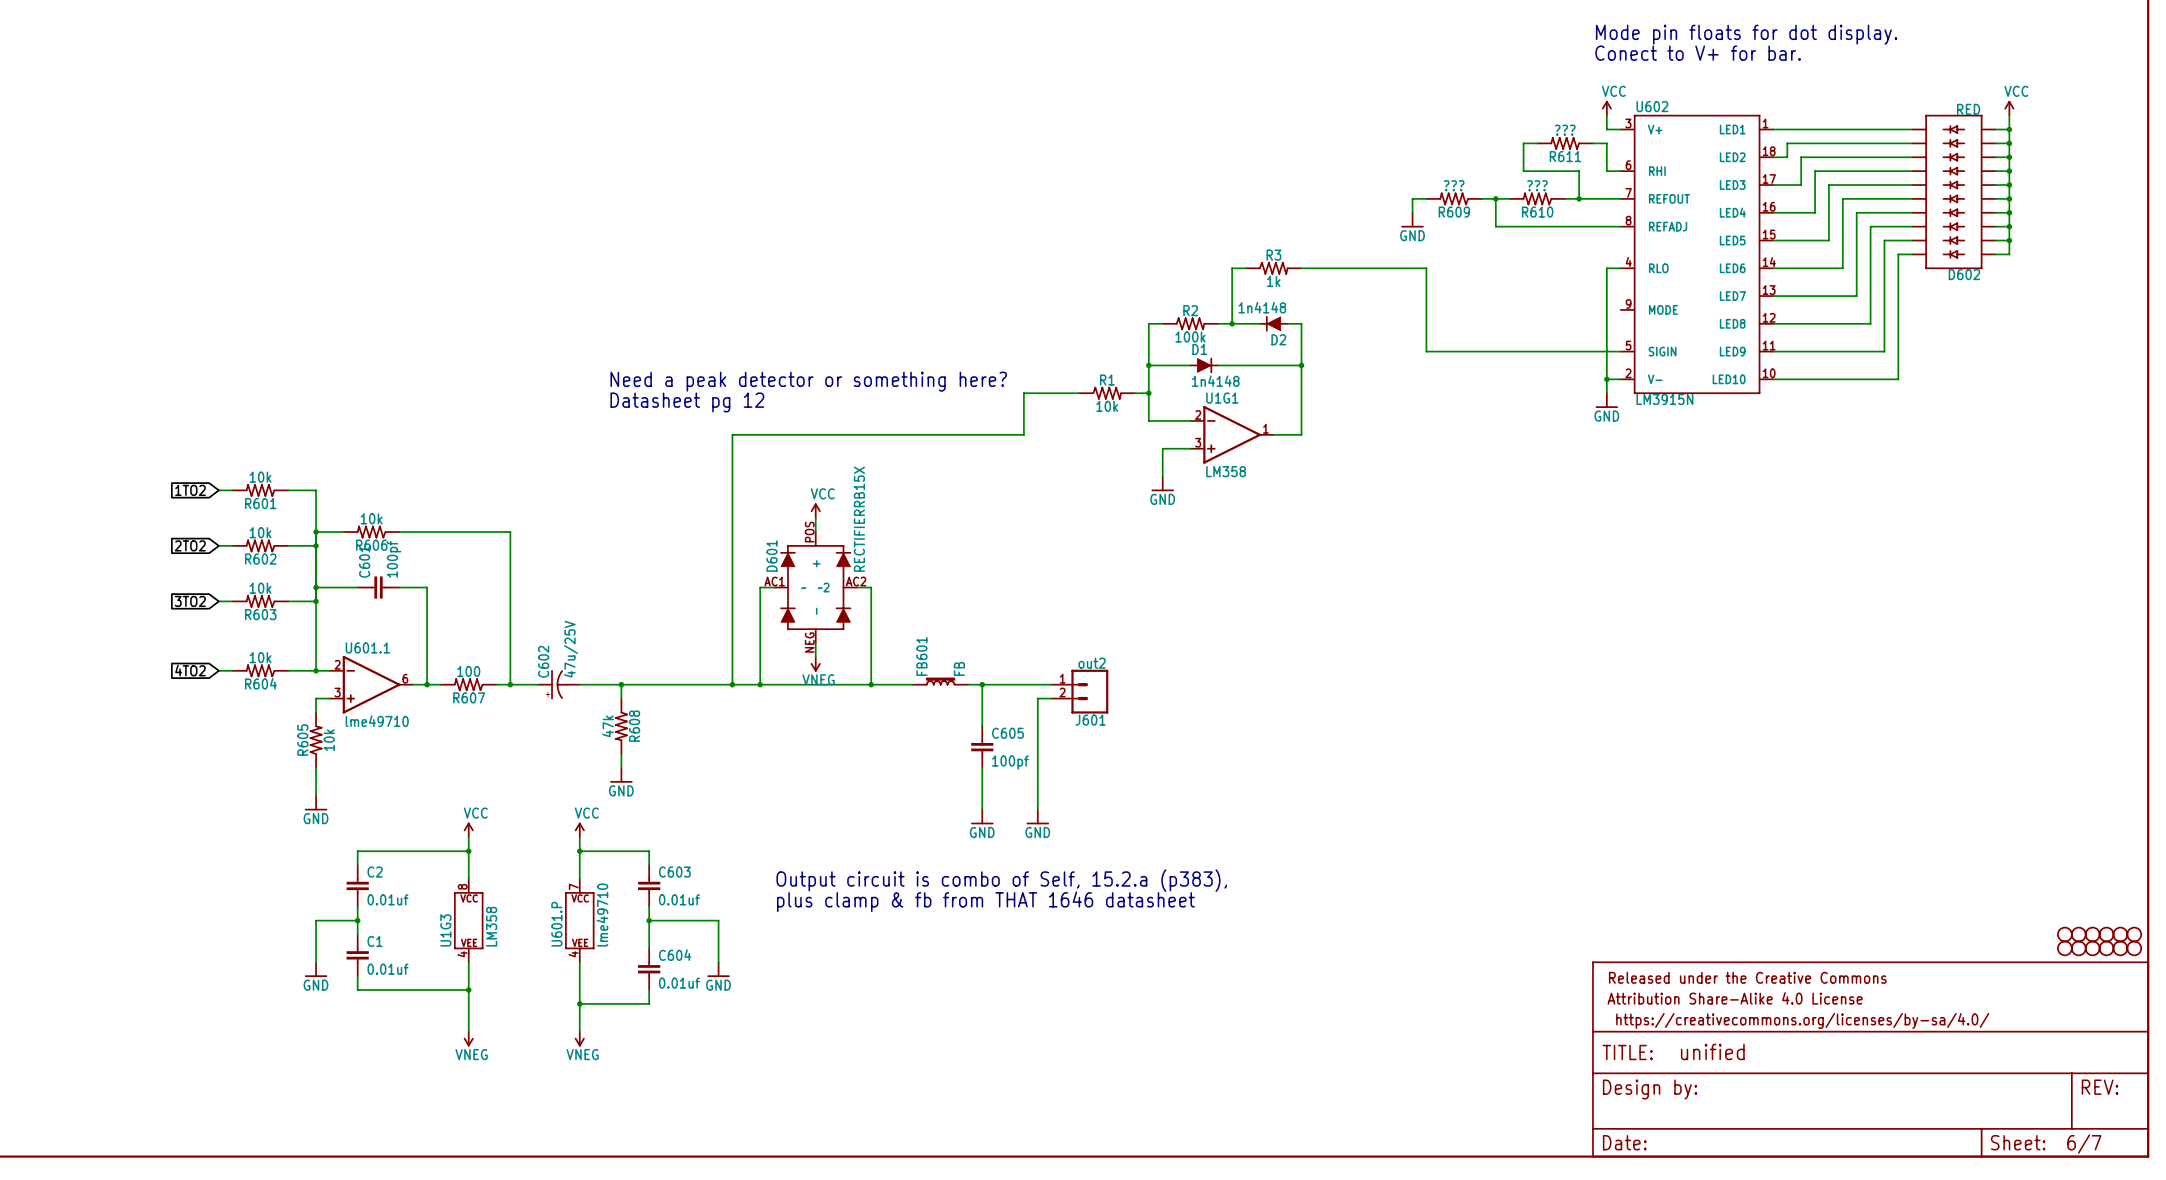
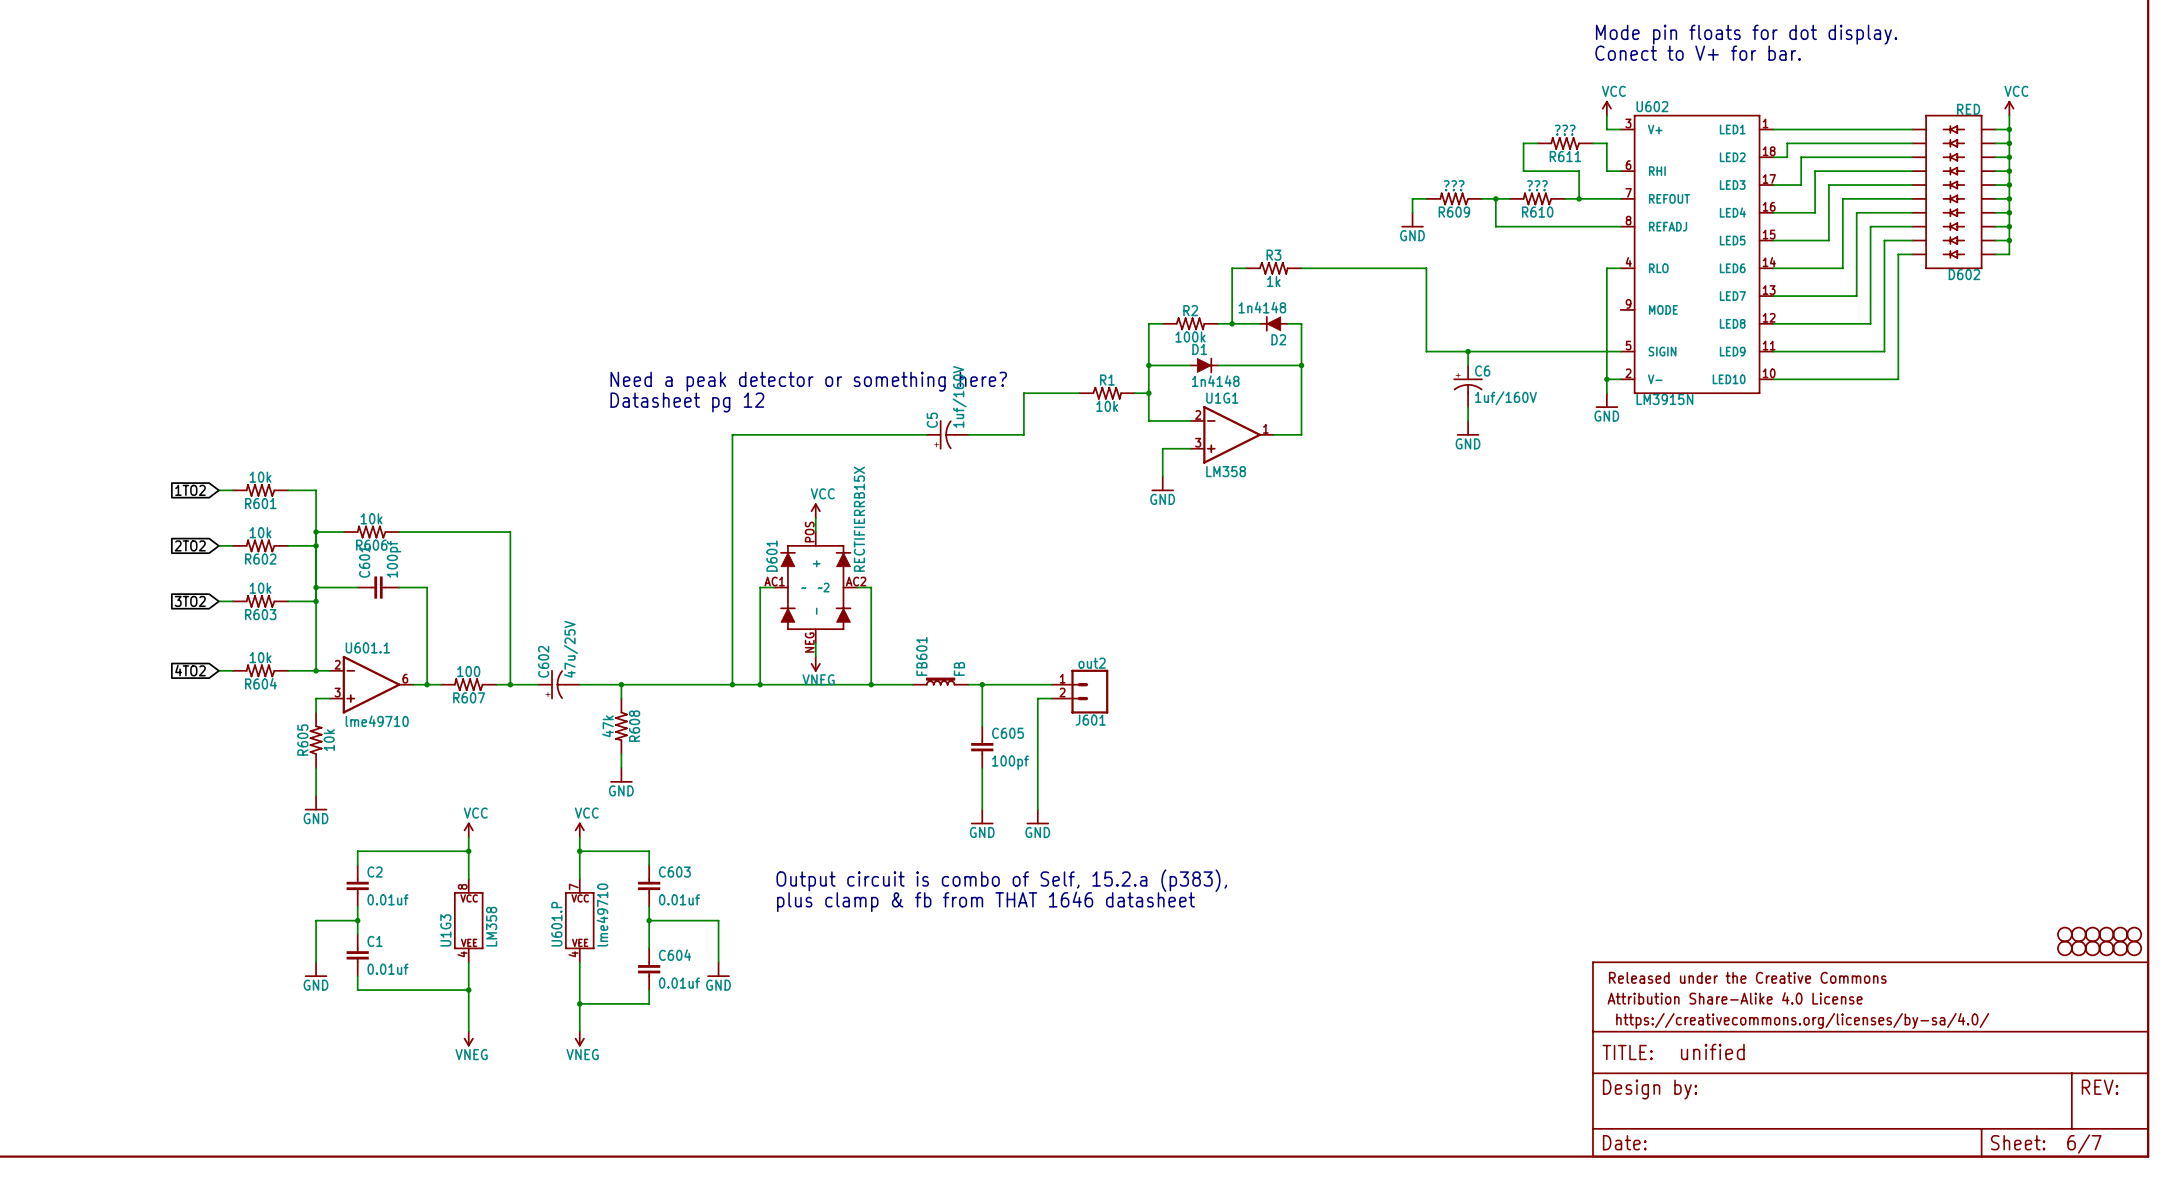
wire: none -> (1468, 351) (1468, 365)
junction: none -> (1468, 351)
C6: none -> 1uf/160V (1468, 386)
wire: none -> (1468, 407) (1468, 420)
power symbol: none -> GND (1468, 428)
C5: none -> 1uf/160V (947, 434)

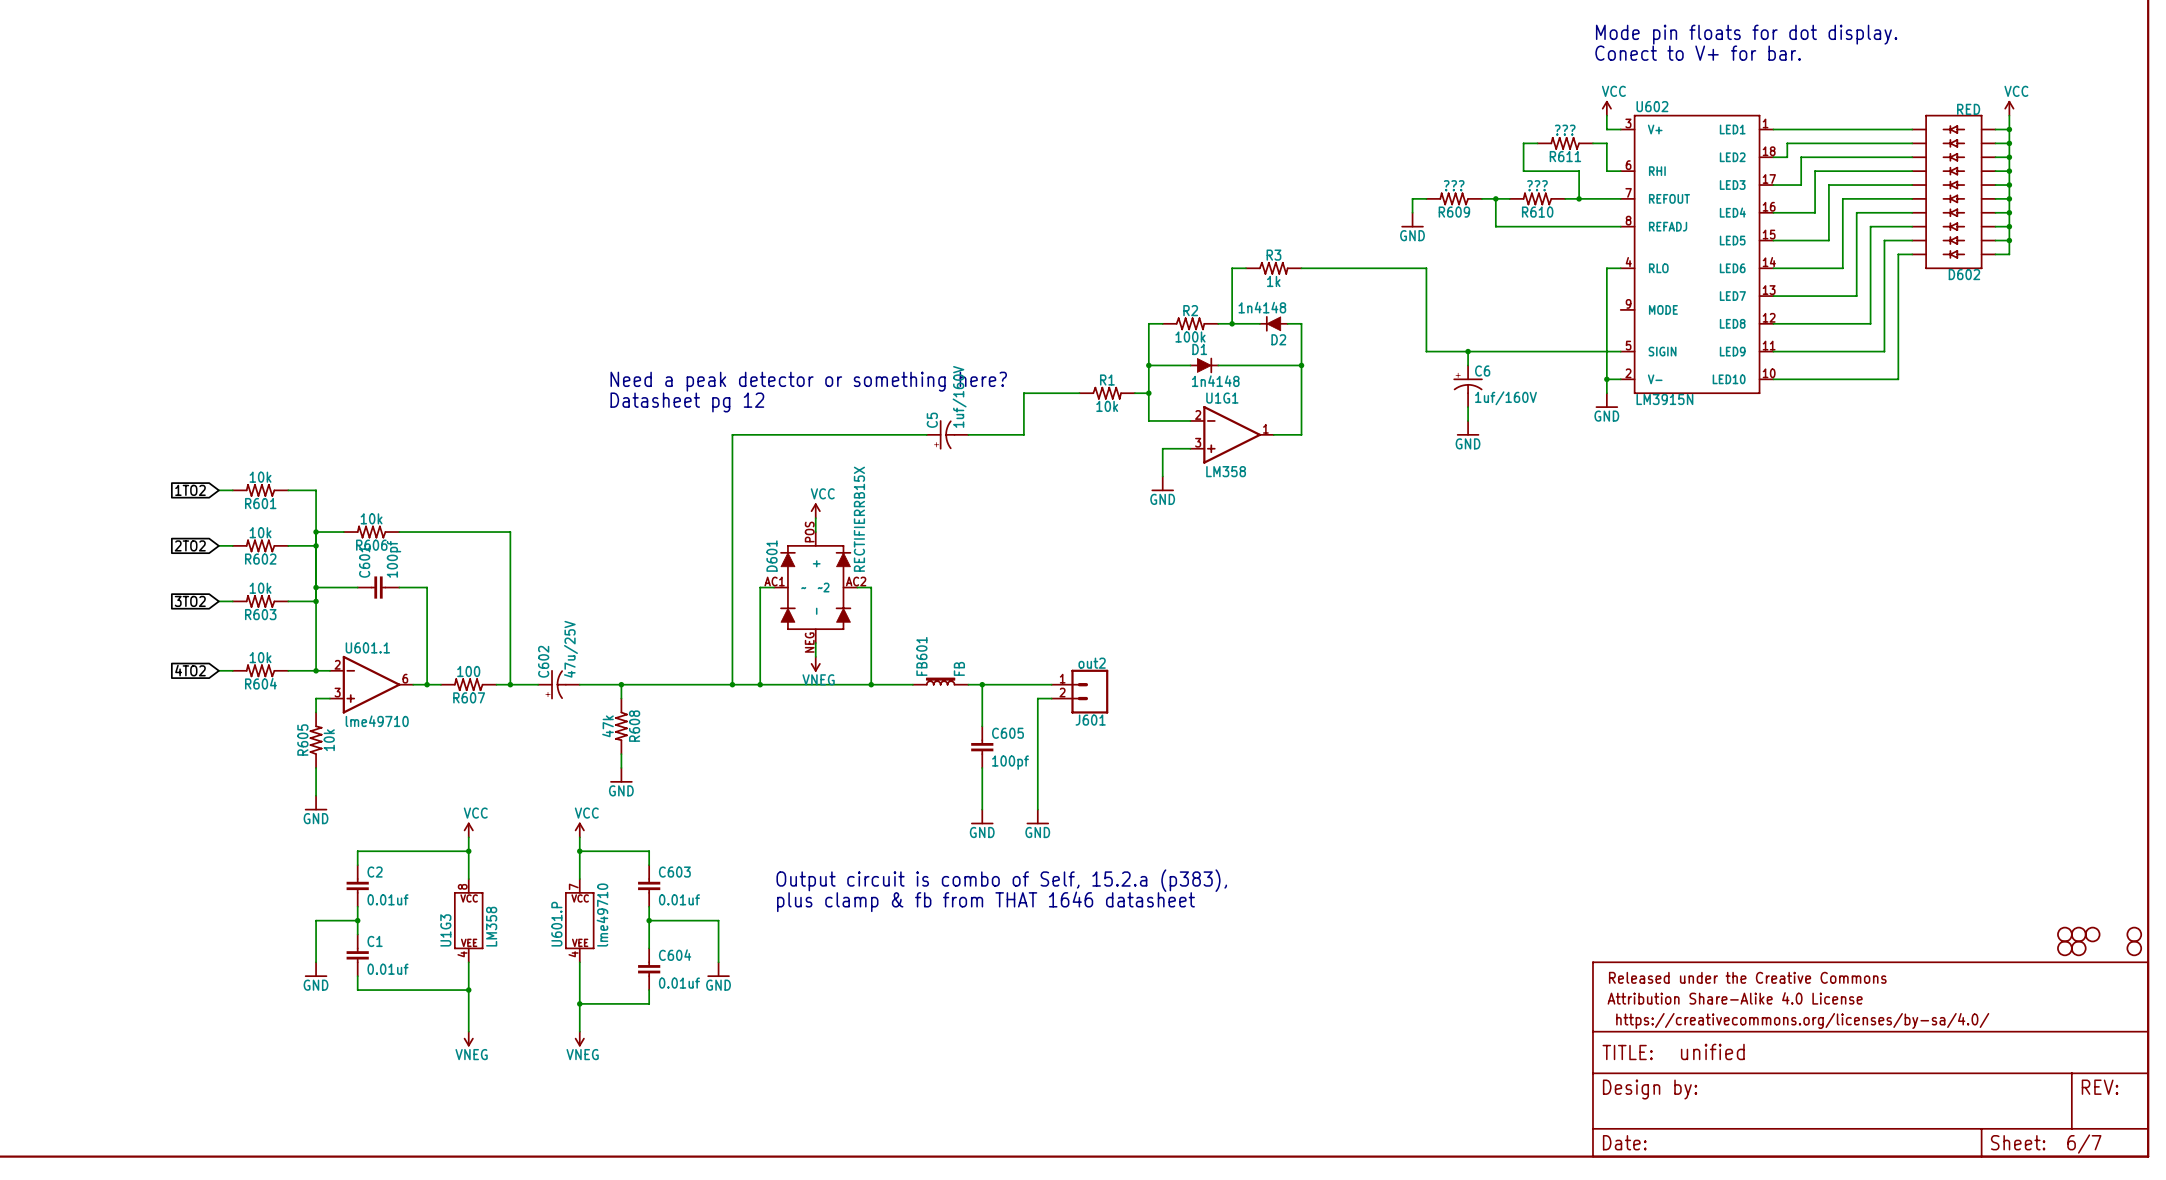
part: (2106, 934) -> none
part: (2120, 934) -> none
part: (2092, 948) -> none
part: (2106, 948) -> none
part: (2120, 948) -> none

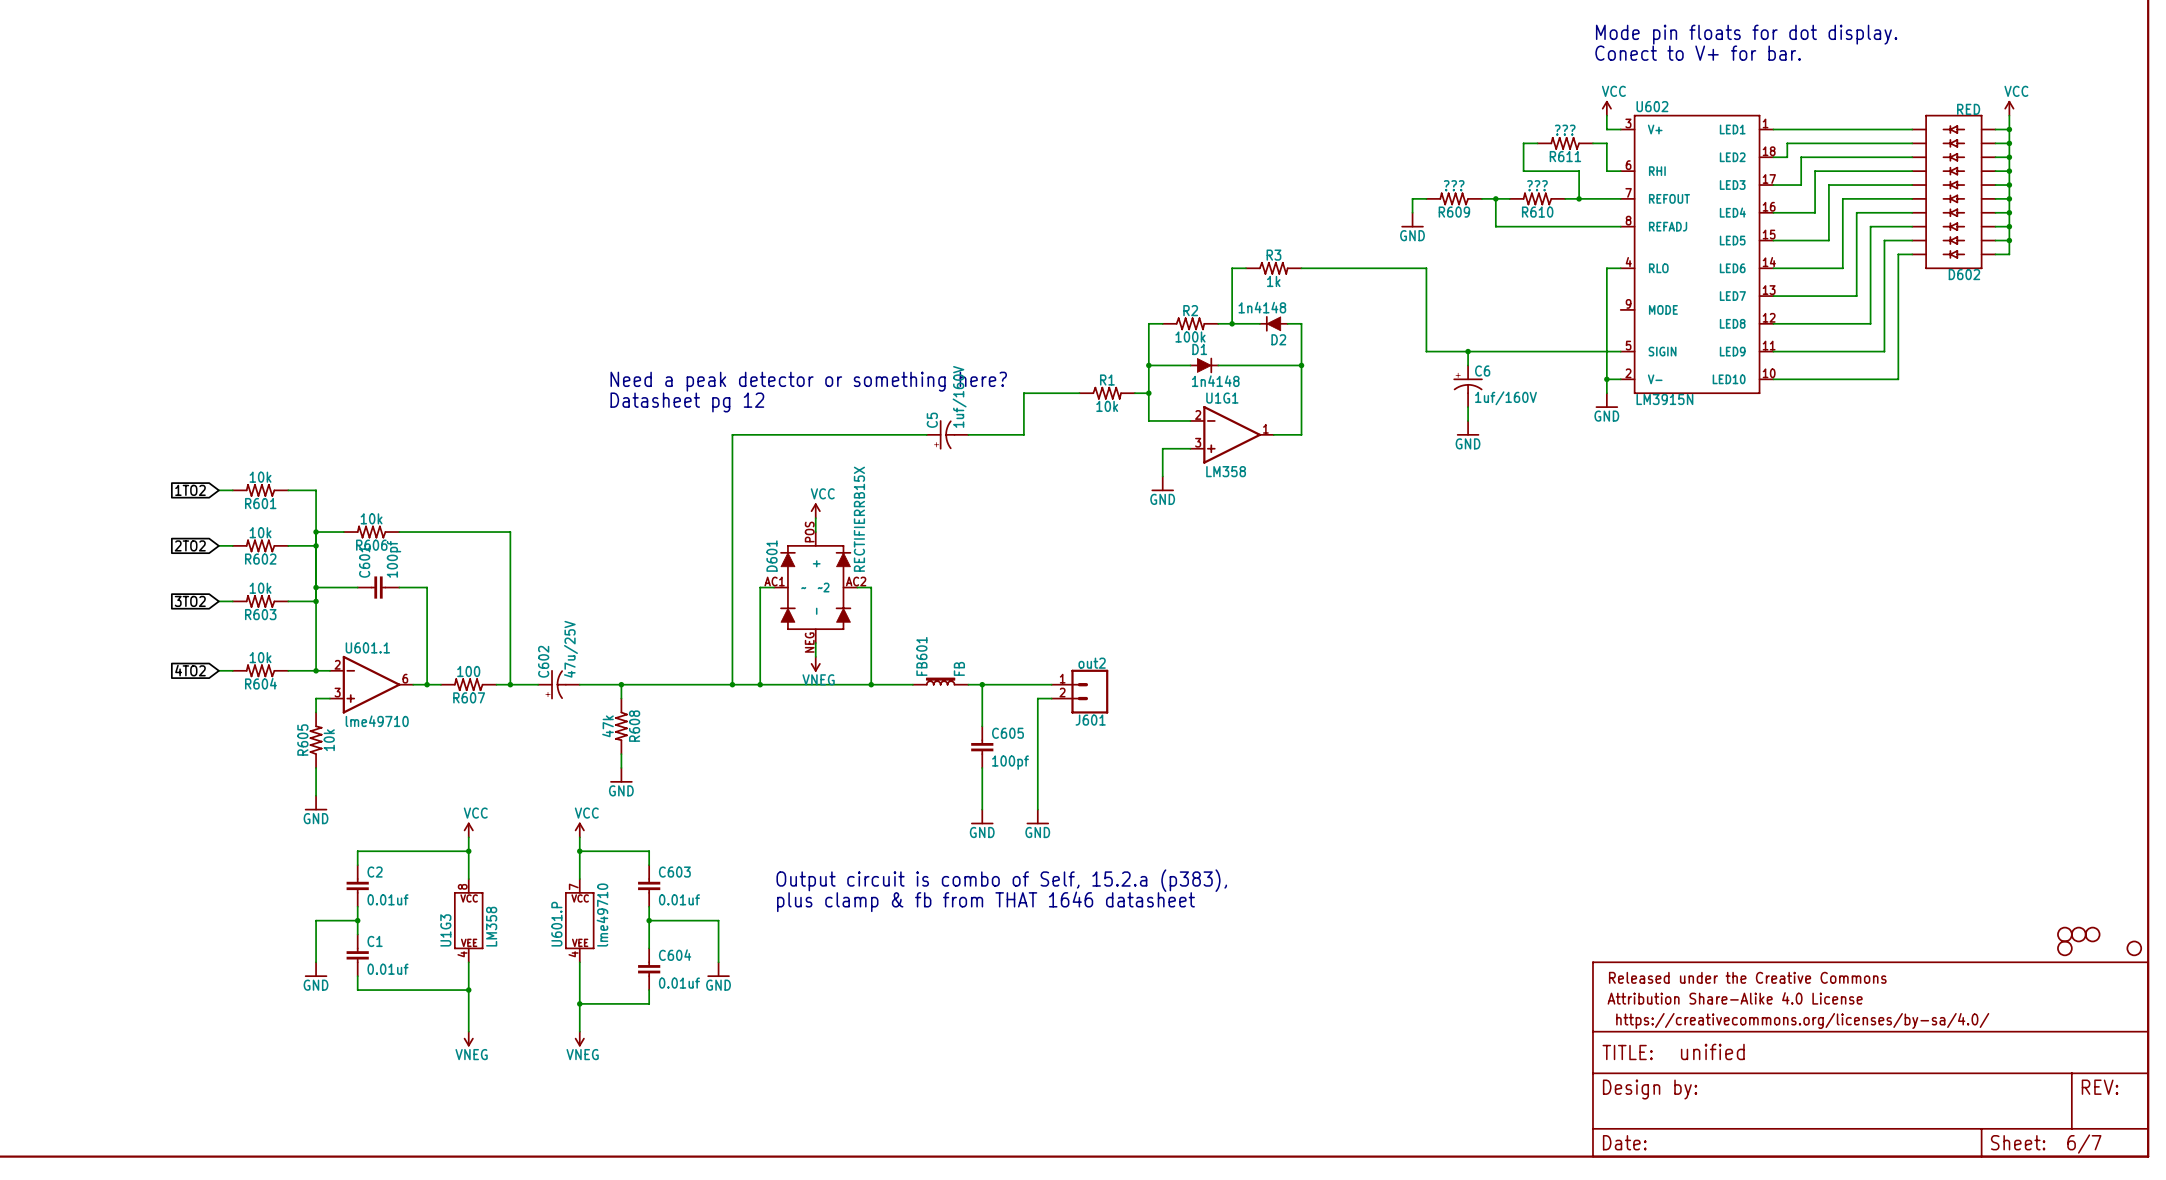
part: (2134, 934) -> none
part: (2078, 948) -> none

